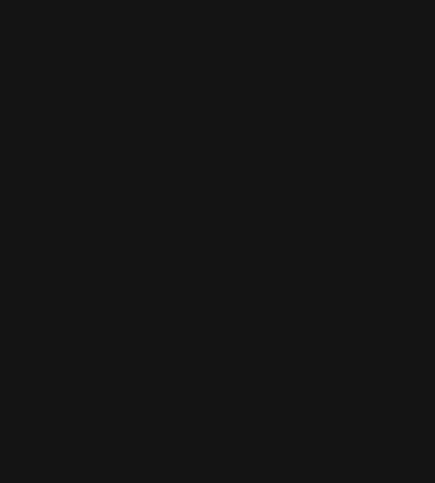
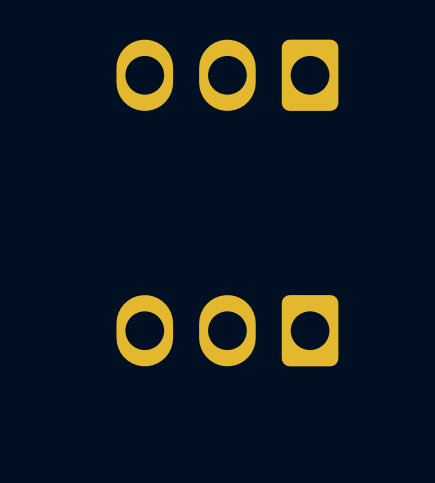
part: none -> (227, 75)
part: none -> (227, 330)

